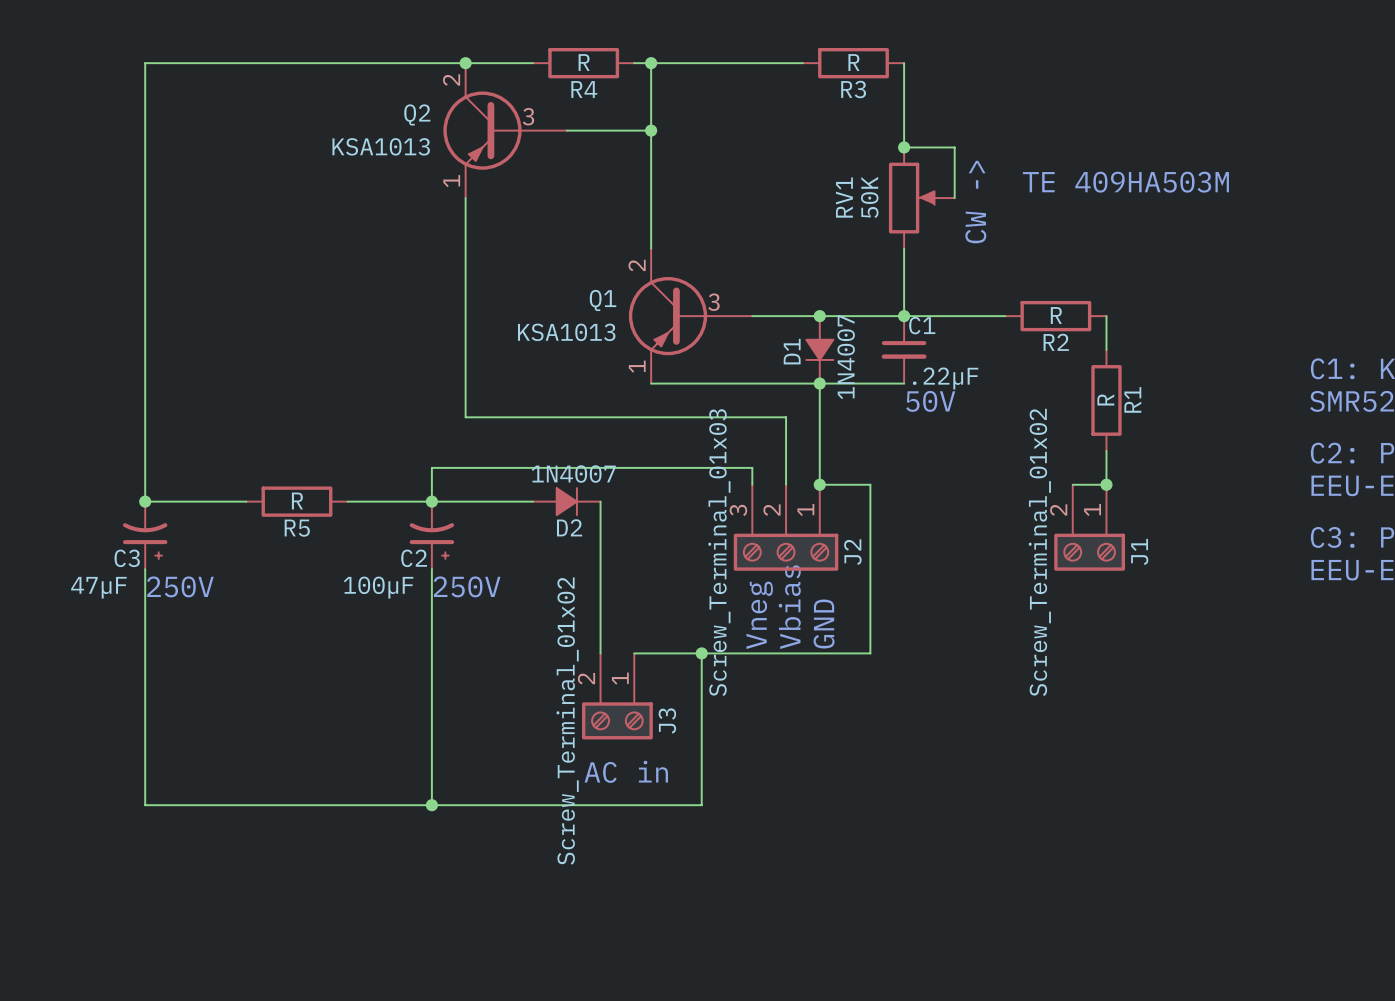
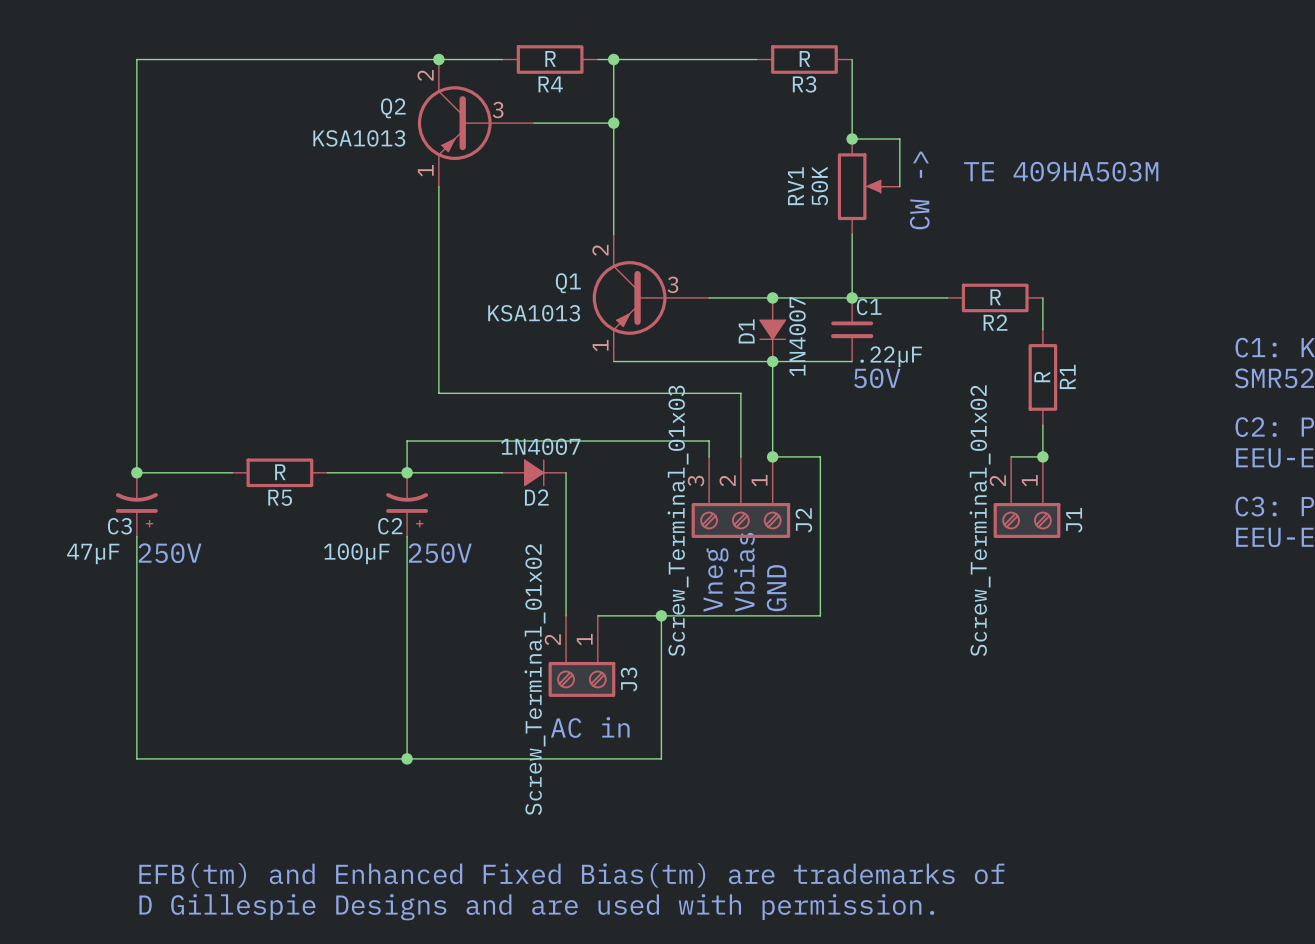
text: none -> EFB(tm) and Enhanced Fixed Bias(tm) are trademarks of (571, 875)
text: none -> D Gillespie Designs and are used with permission. (536, 907)

